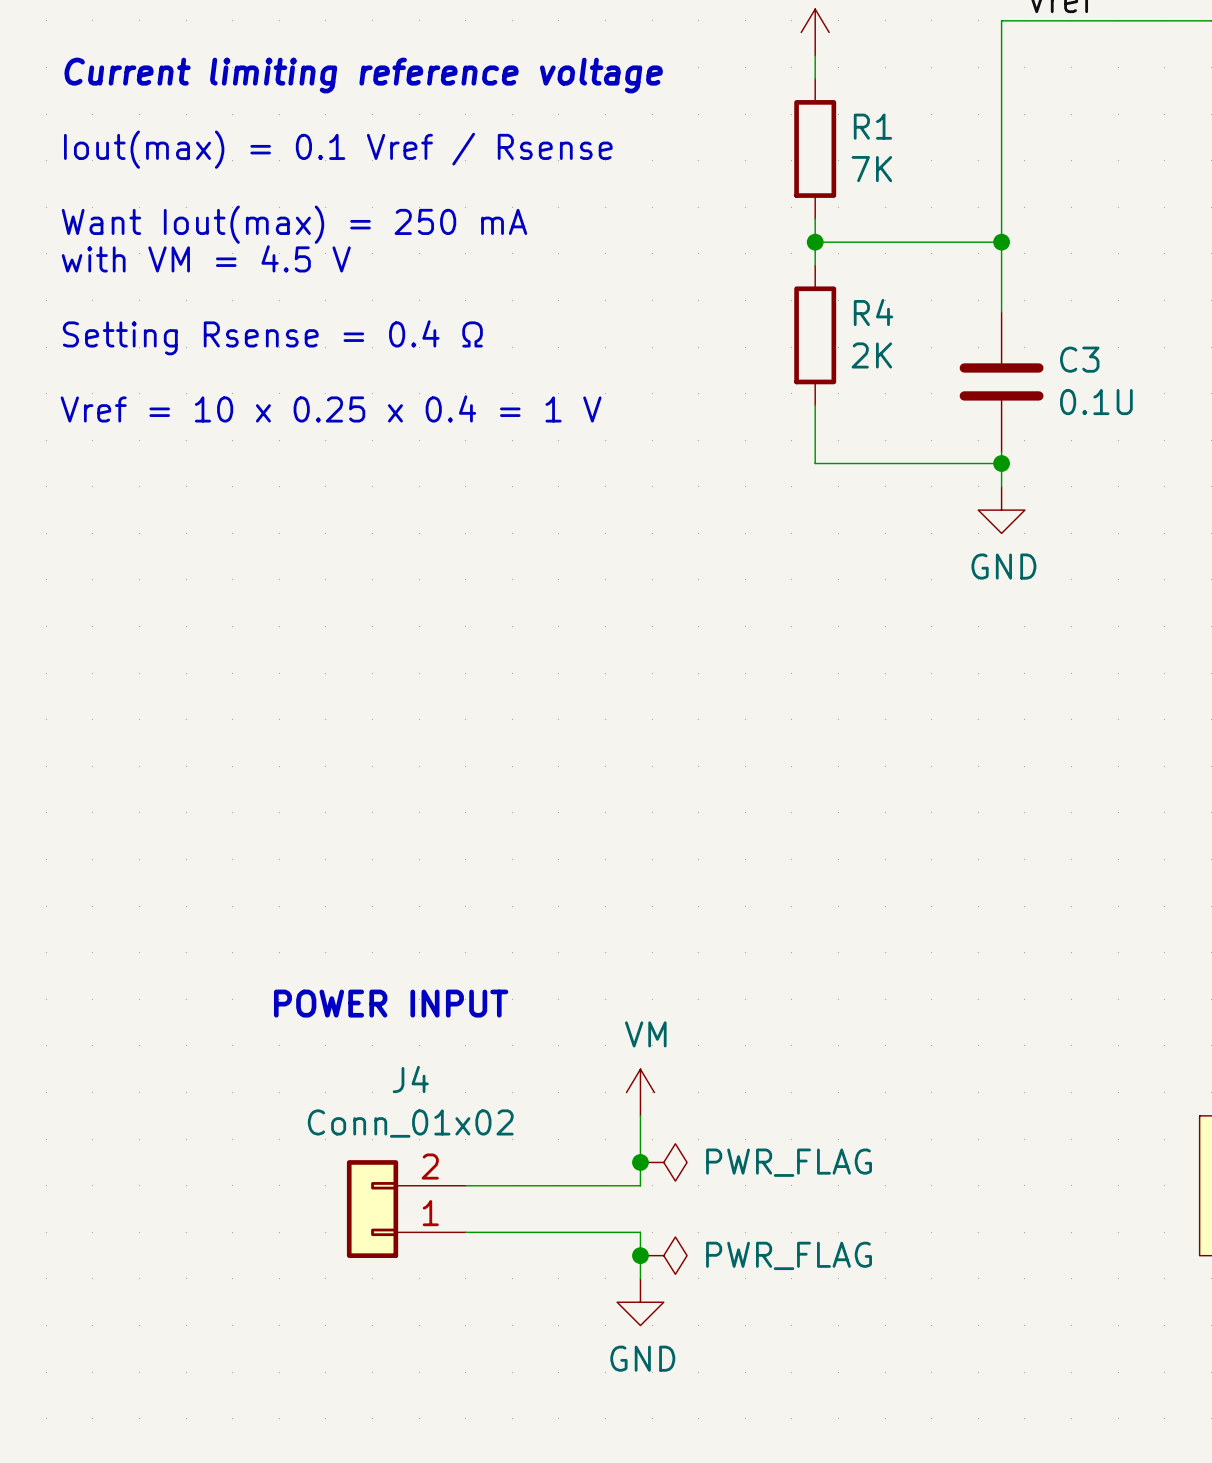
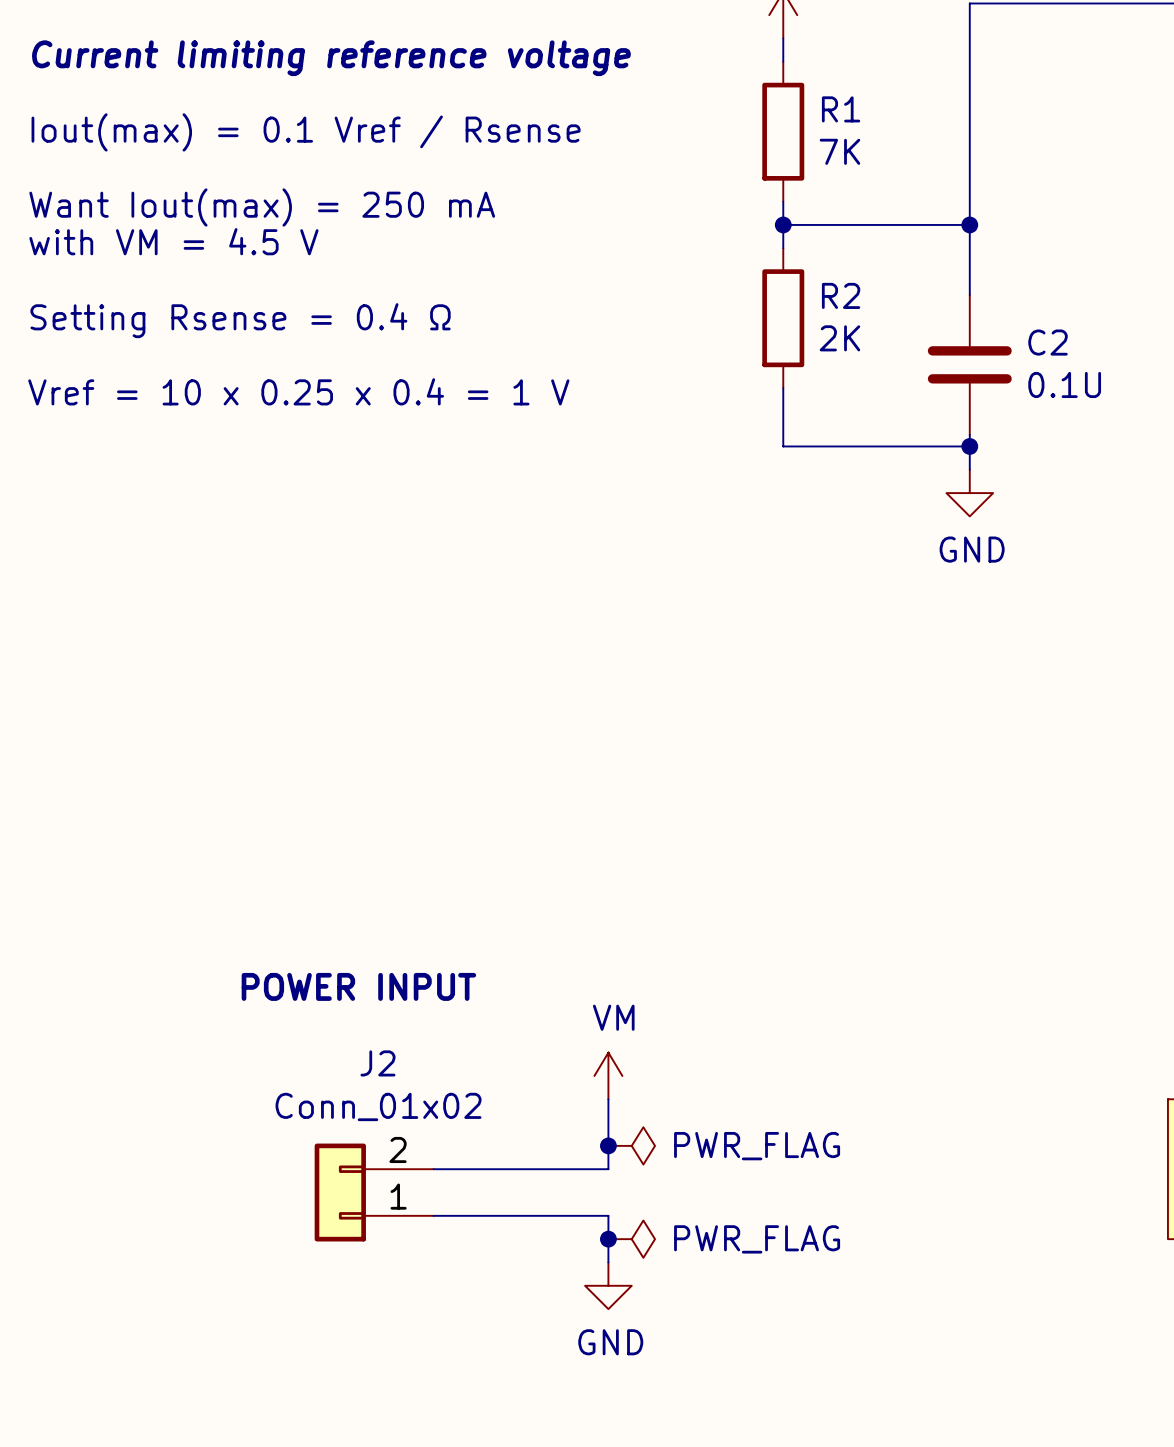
R4 name: R4 (873, 312) -> R2 (841, 295)
C3 name: C3 (1079, 359) -> C2 (1048, 342)
J4 name: J4 (410, 1079) -> J2 (377, 1063)

